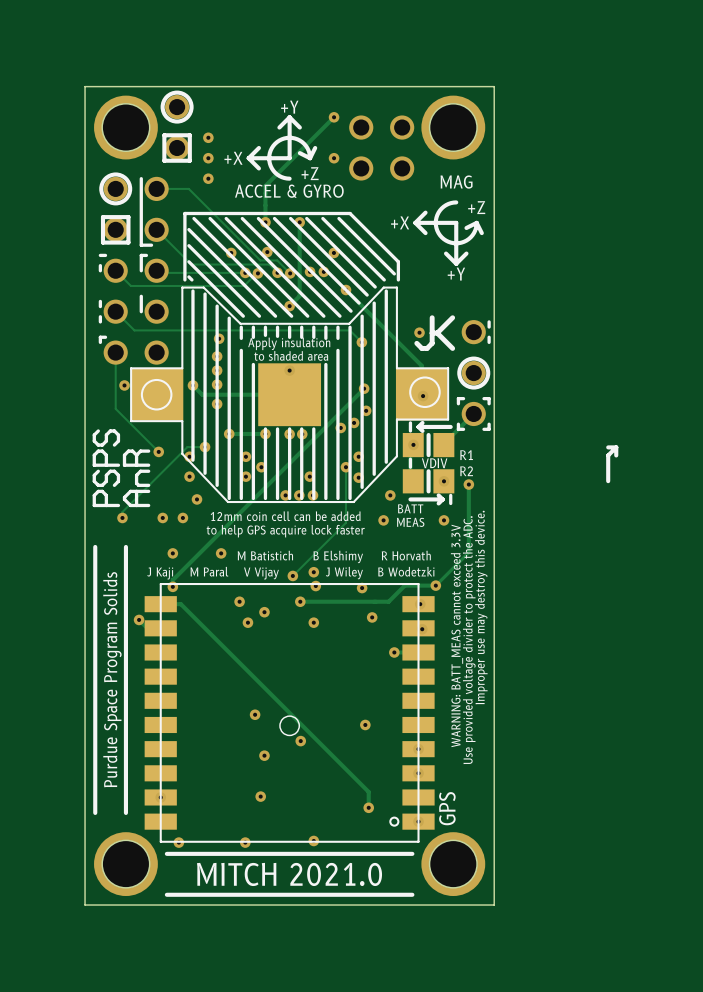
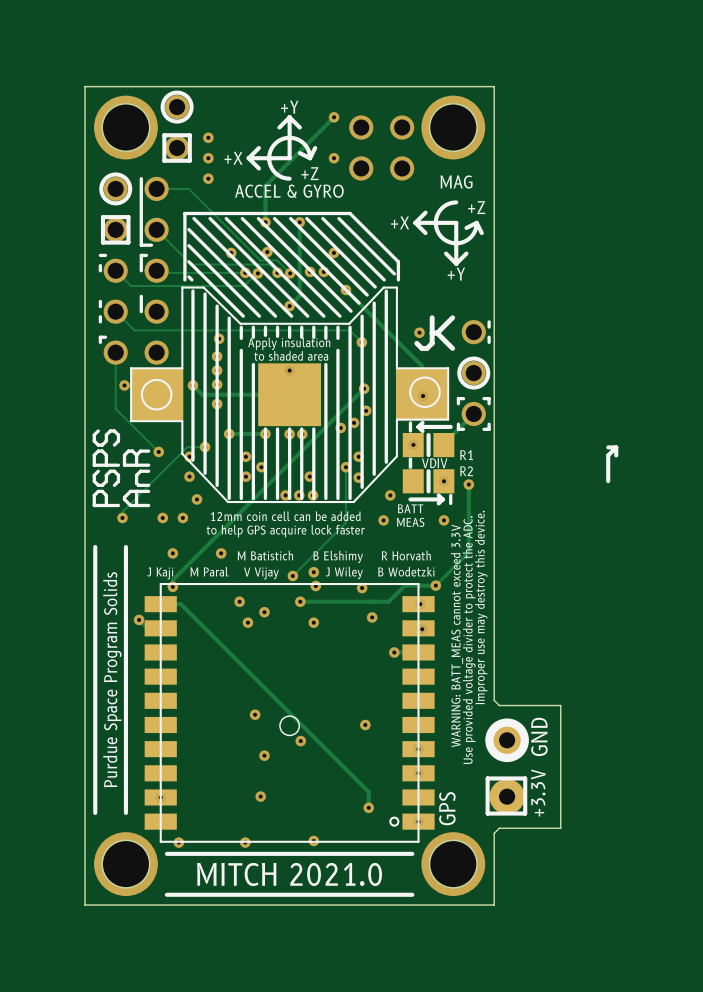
board edge: (494, 700) (494, 833) -> (494, 700) (499, 705) (560, 705) (560, 828) (499, 828) (494, 833)
drawing: none -> [485, 718, 529, 763]
text: none -> GND (539, 736)
part: none -> (507, 768)
line: none -> (525, 778) (487, 778) (487, 813) (525, 813) (525, 778)
text: none -> +3.3V (538, 792)

